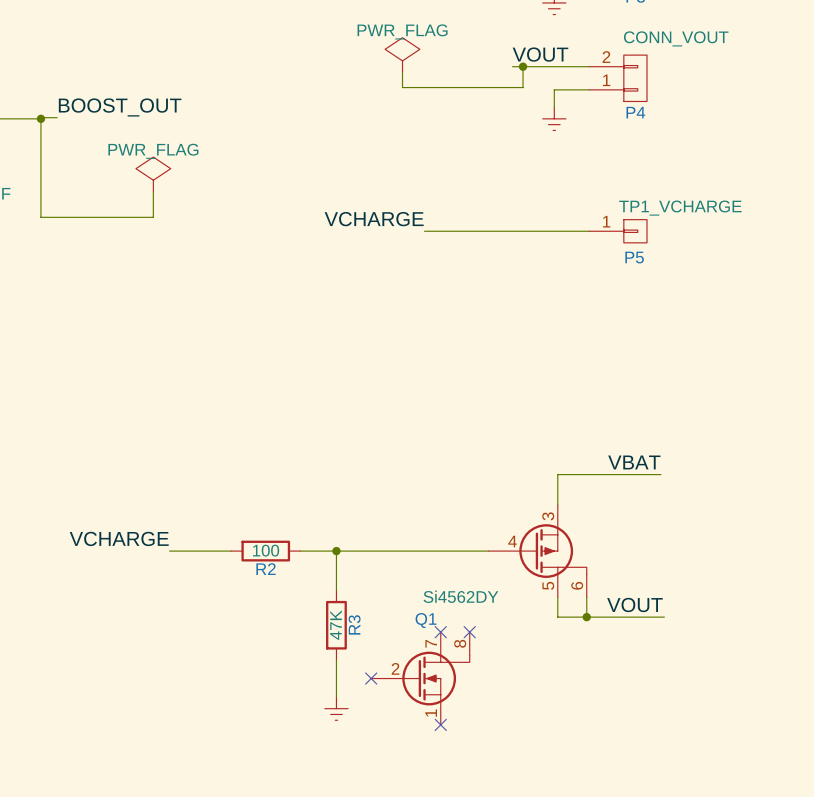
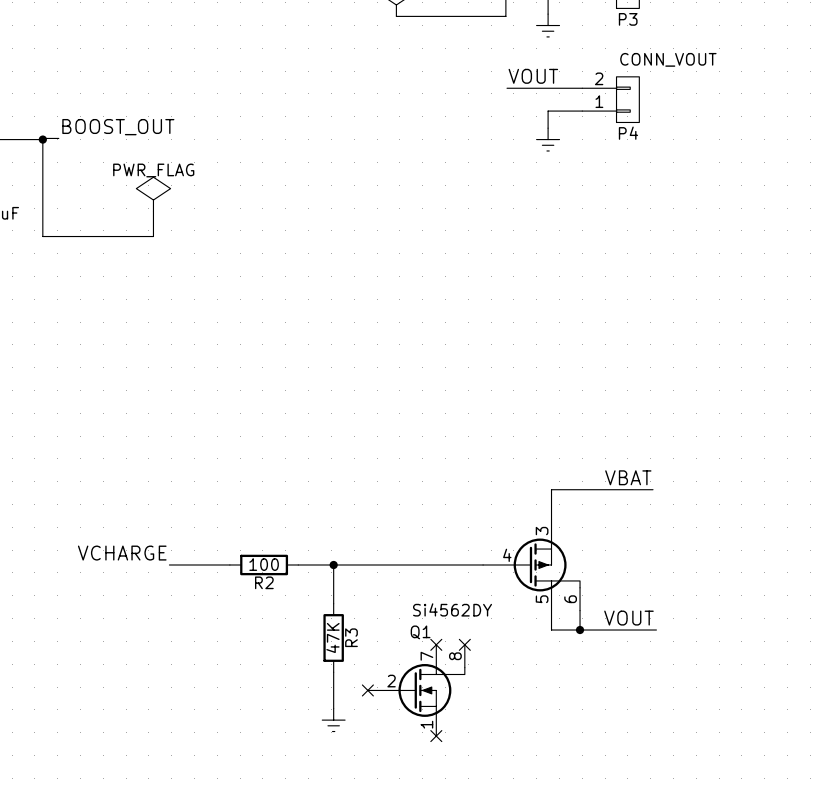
power symbol: PWR_FLAG (402, 55) -> none
wire: (523, 66) (523, 87) (402, 87) (402, 72) -> none
junction: (523, 66) -> none
label: VCHARGE (374, 219) -> none
wire: (424, 231) (589, 231) -> none
P5: TP1_VCHARGE (618, 231) -> none

